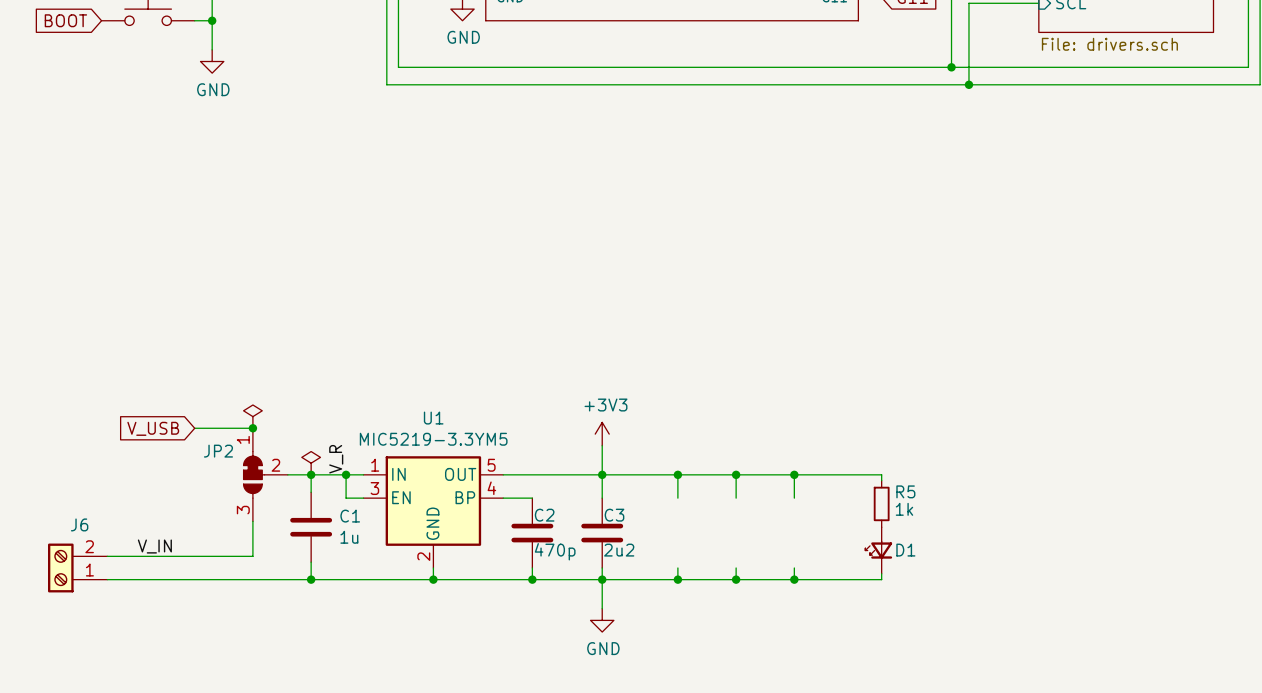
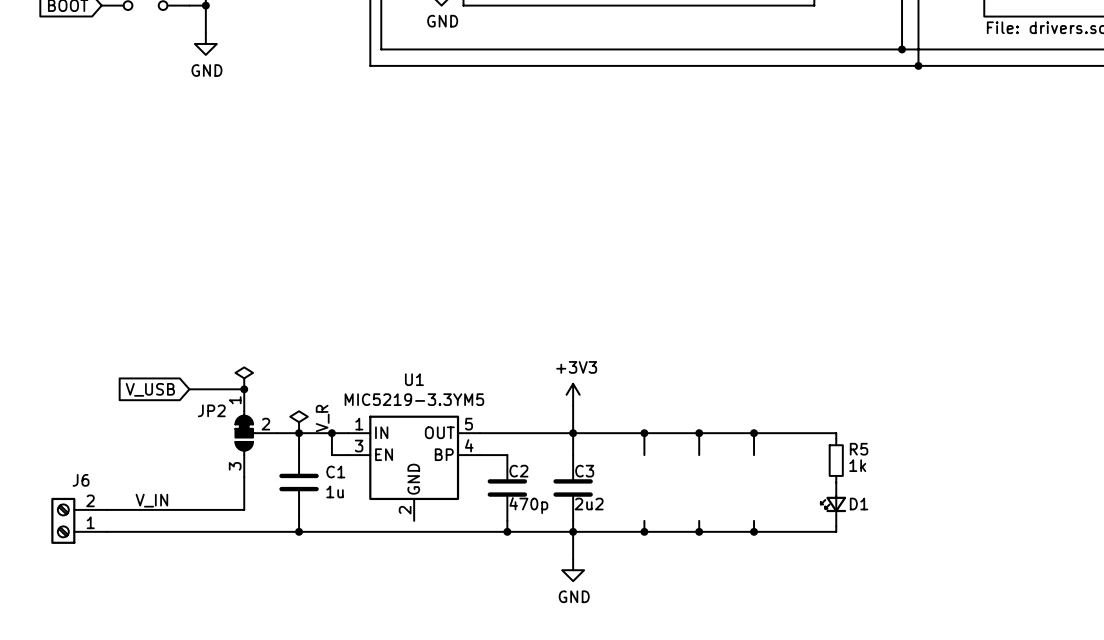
wire: (433, 567) (433, 579) -> none
junction: (433, 579) -> none

